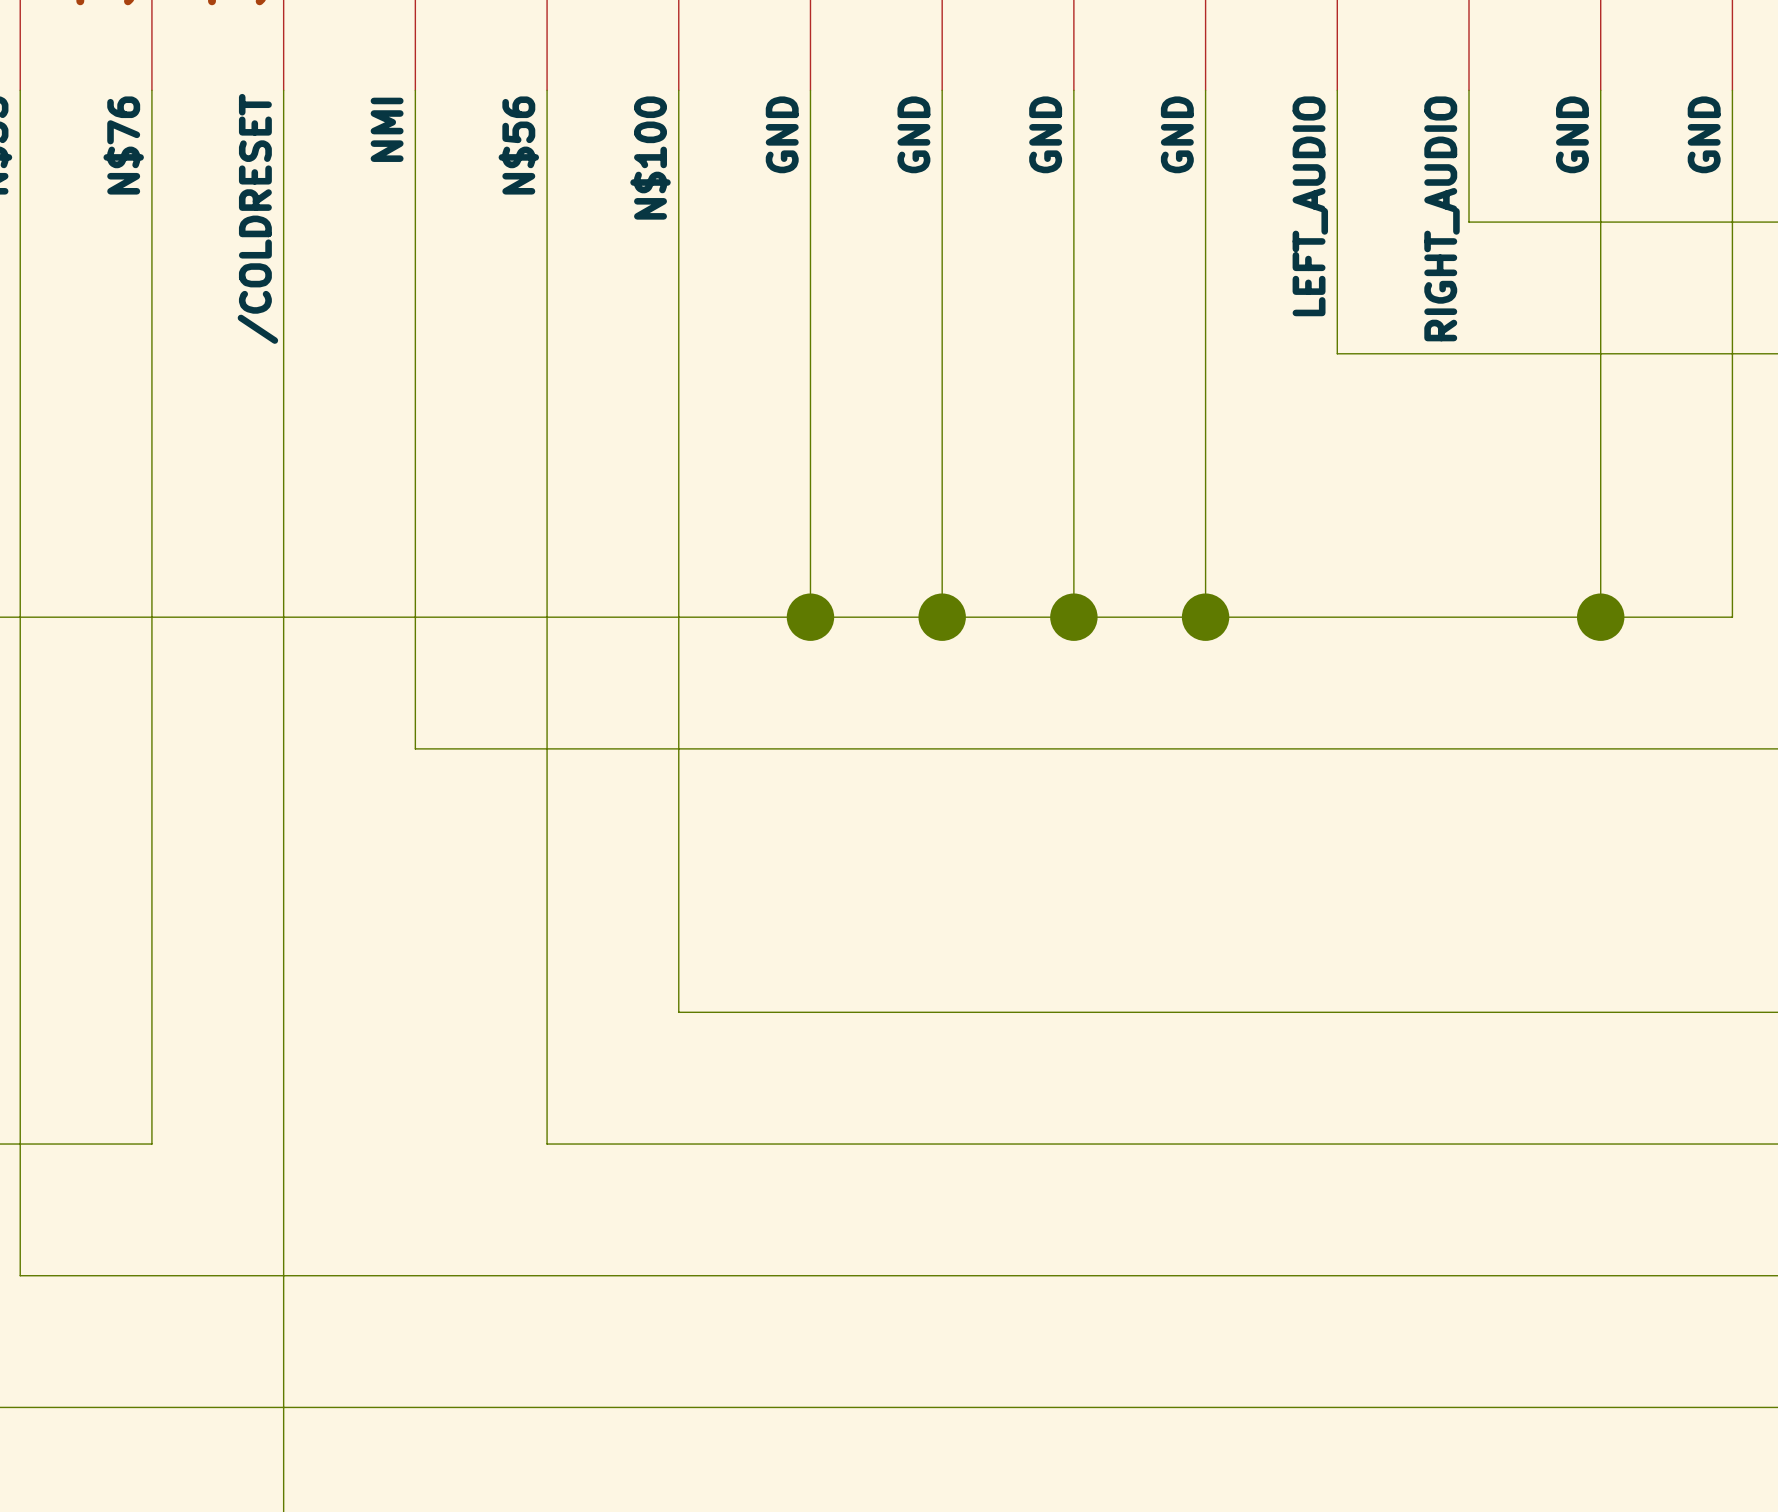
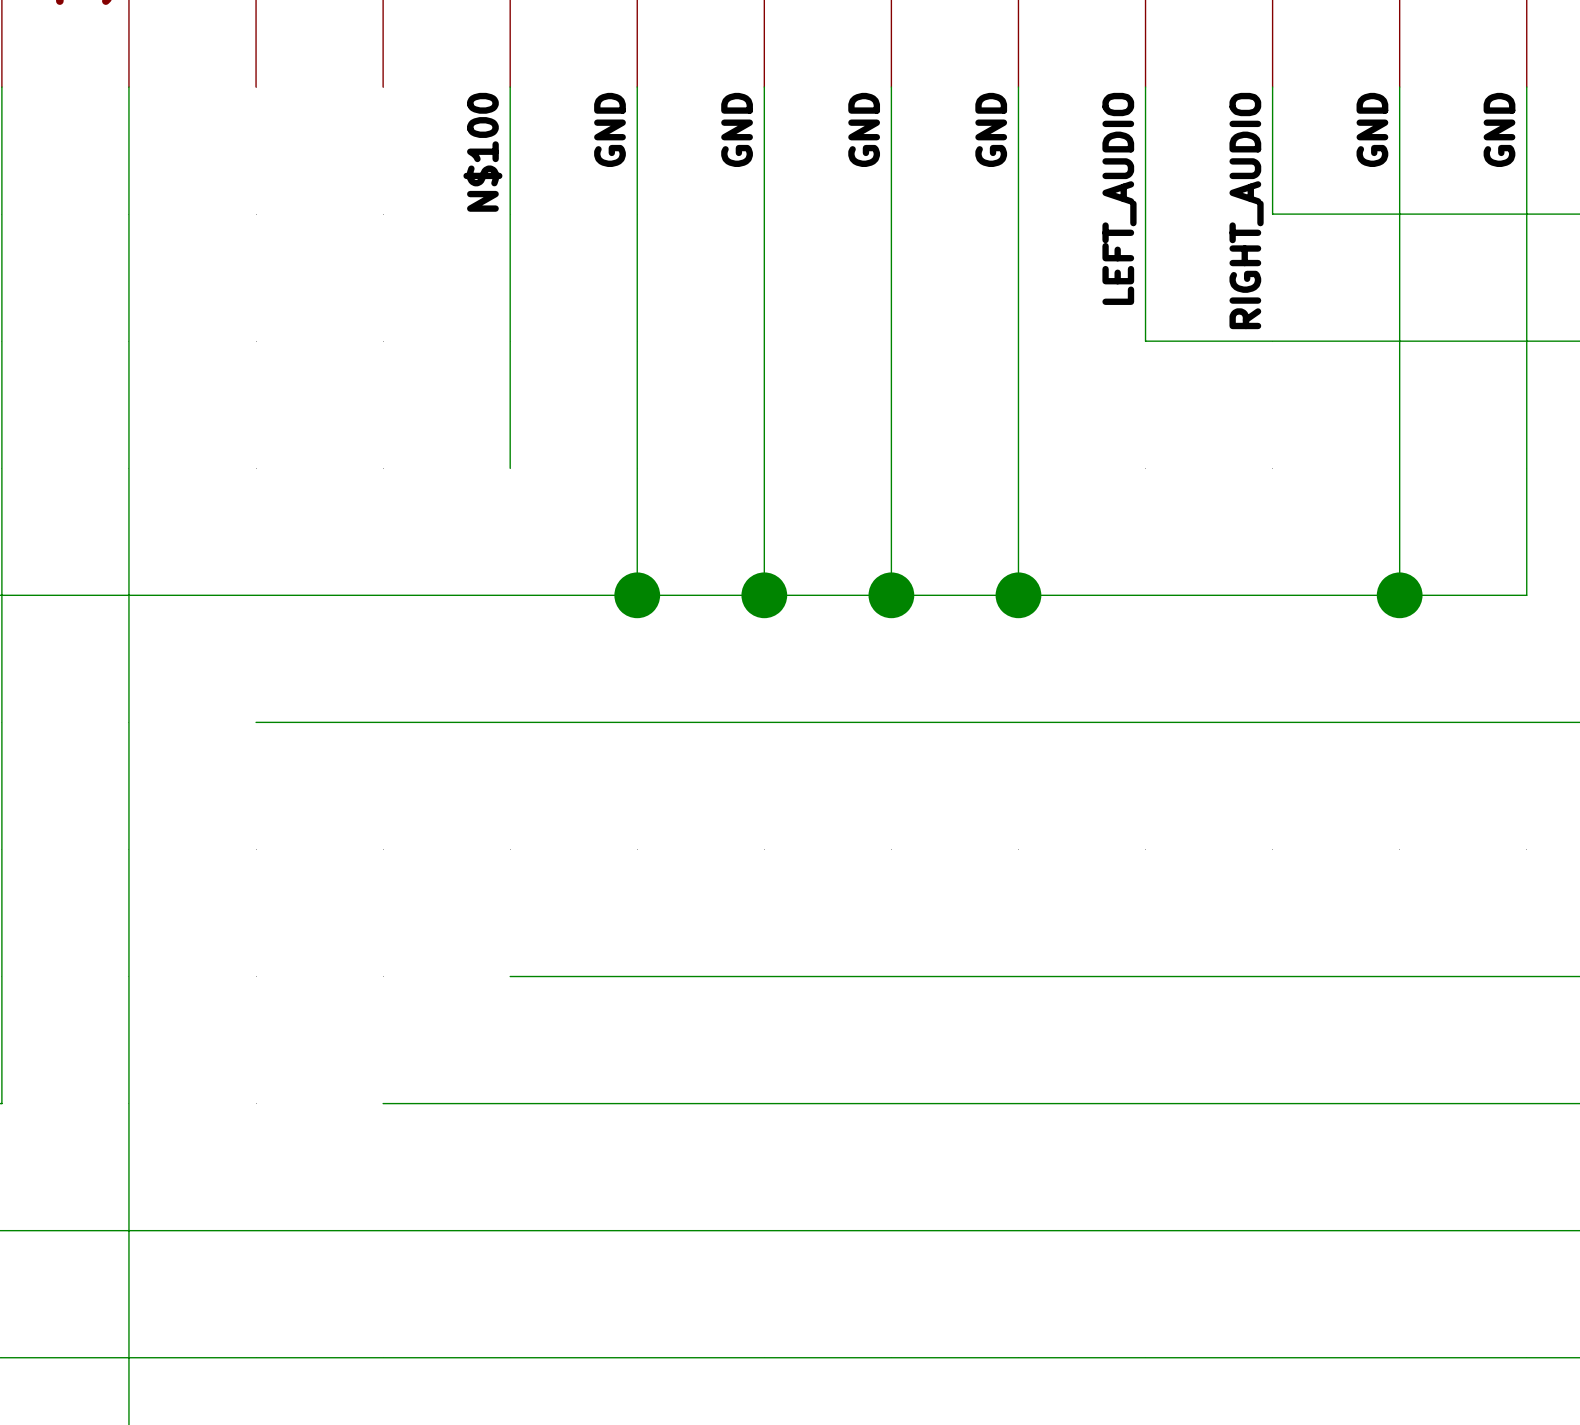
wire: (415, 90) (415, 748) -> none
wire: (547, 90) (547, 1144) -> none
label: NMI (387, 129) -> none
label: N$56 (518, 145) -> none
label: /COLDRESET (257, 218) -> none
wire: (678, 485) (678, 1012) -> none

